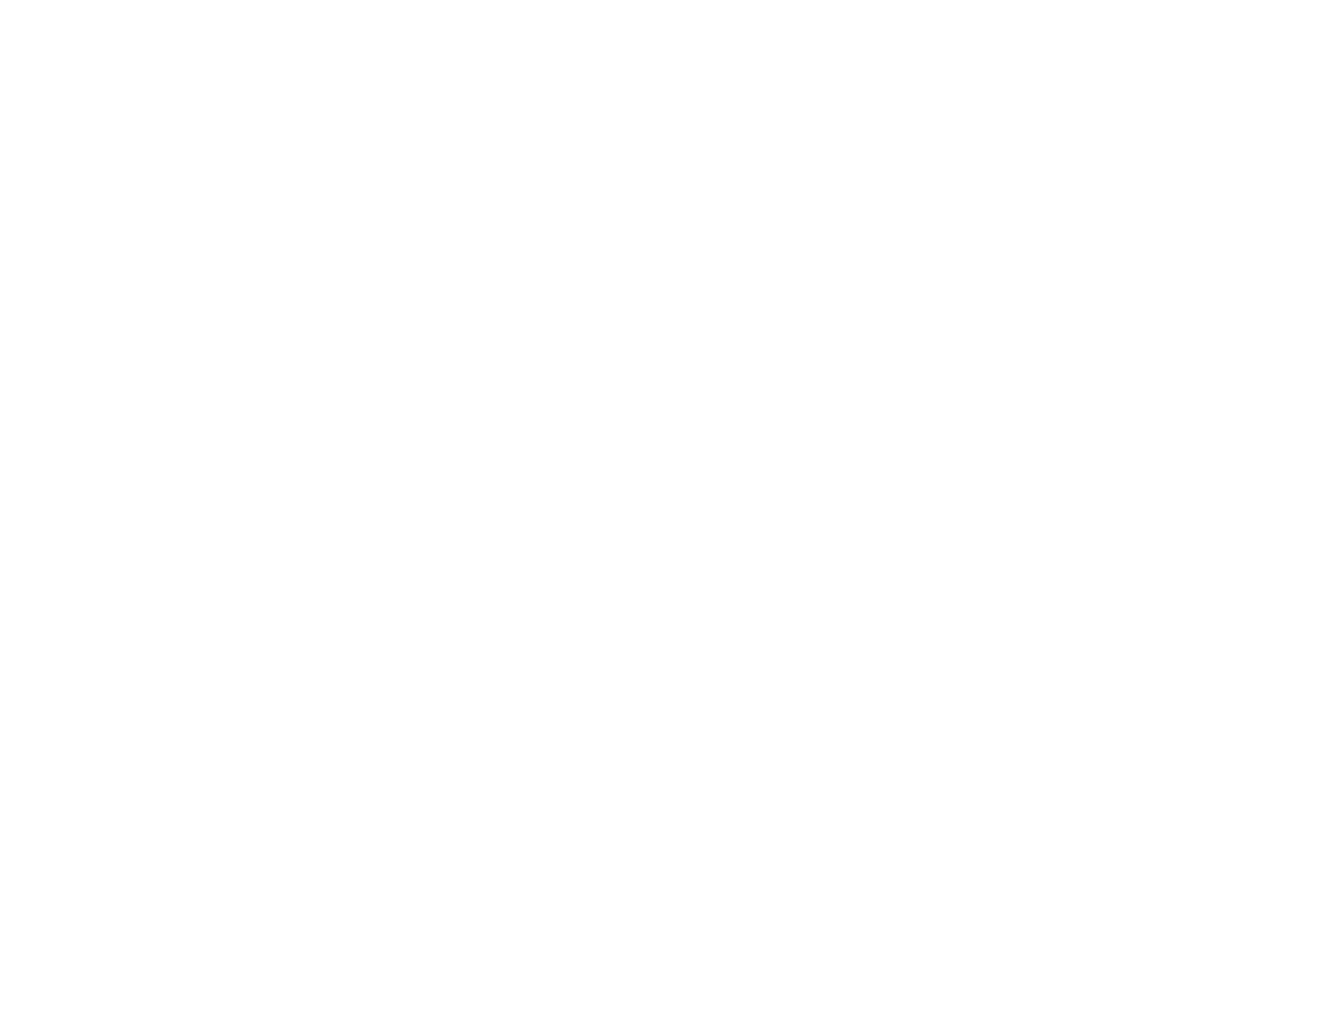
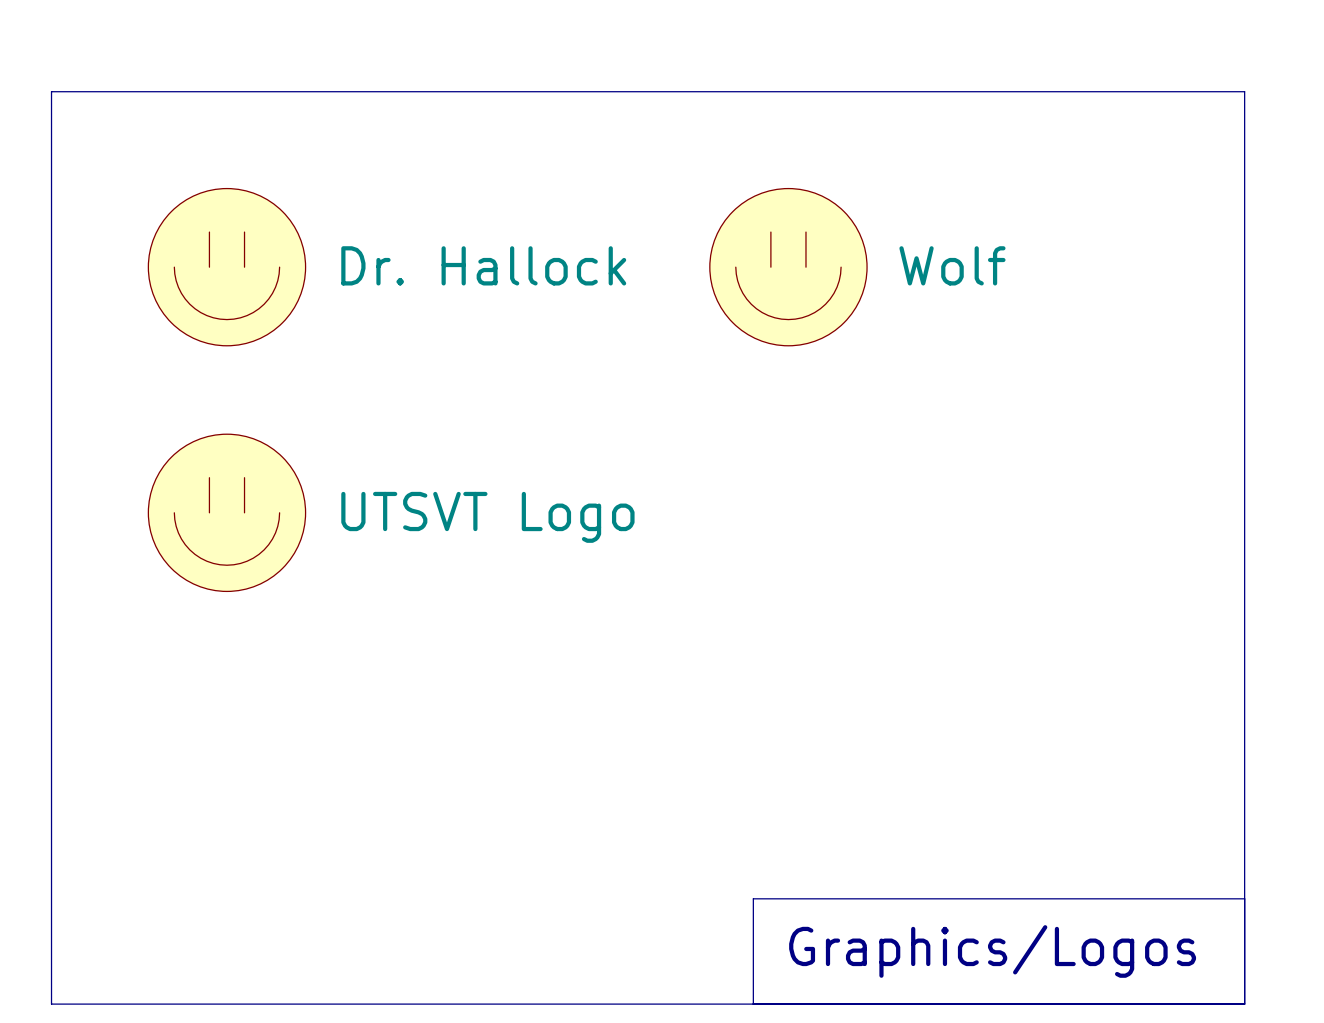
line: none -> (51, 91) (1244, 91) (1244, 1004) (51, 1004) (51, 91)
part: none -> Dr. Hallock (226, 267)
part: none -> Wolf (788, 267)
part: none -> UTSVT Logo (226, 512)
line: none -> (1244, 898) (753, 898) (753, 1004)
text: none -> Graphics/Logos (992, 951)

